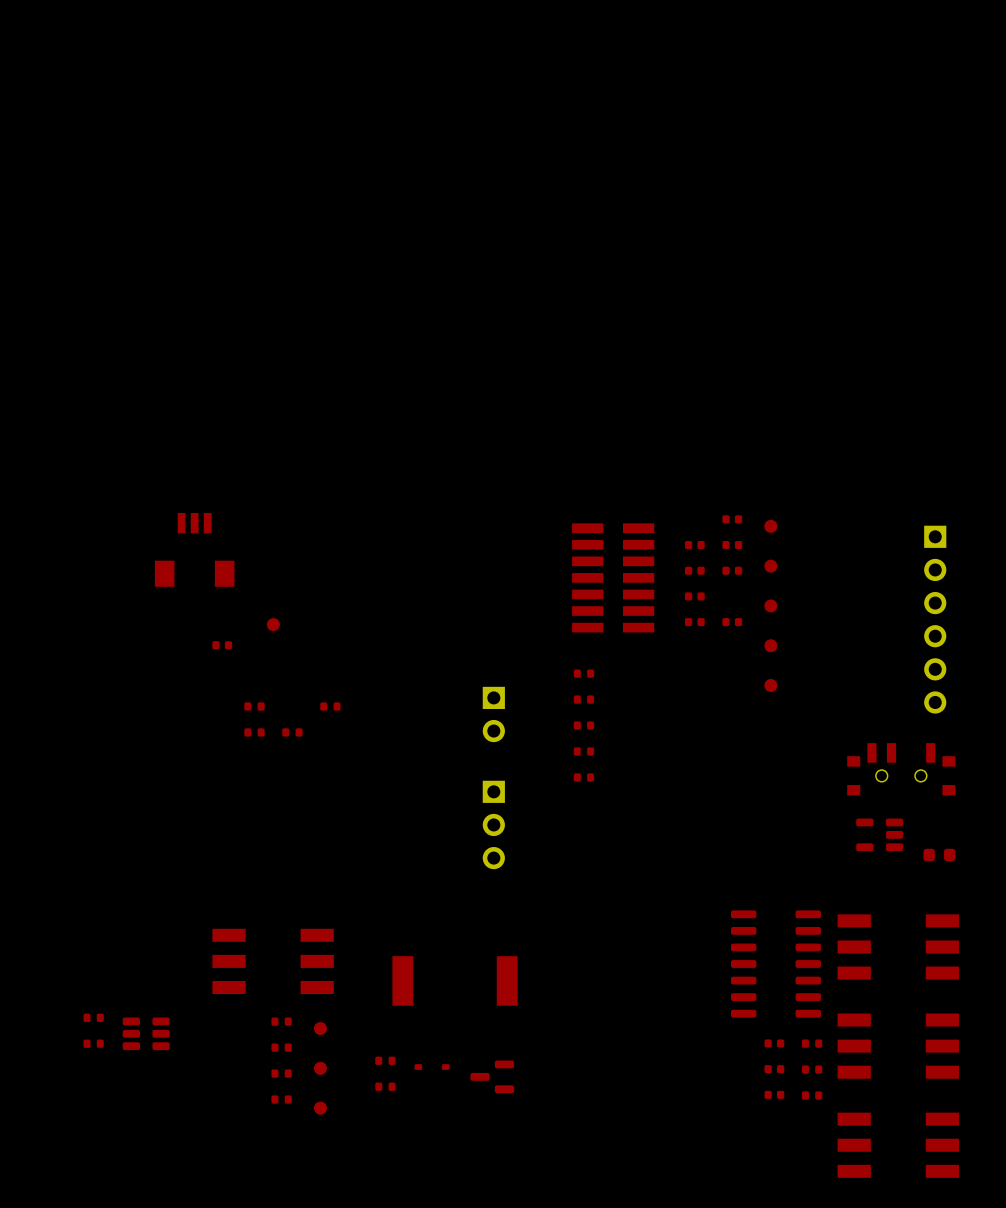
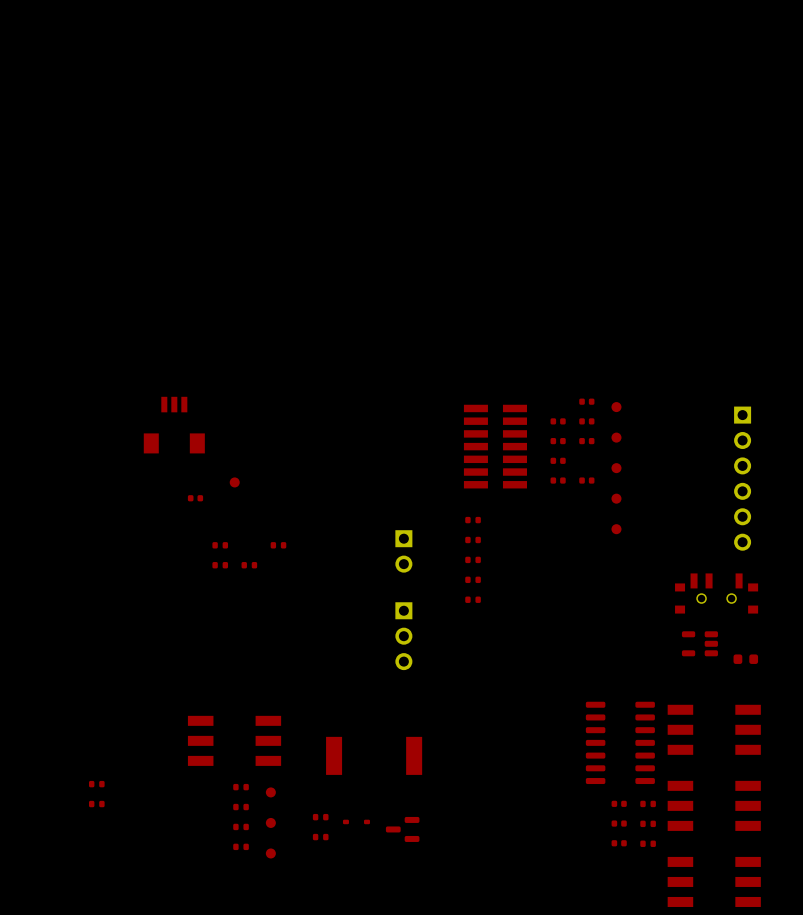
part: (146, 1033) -> none

